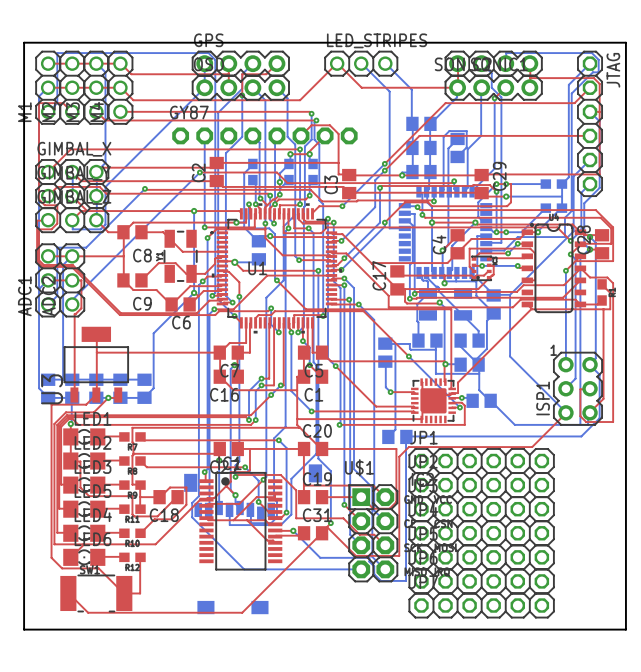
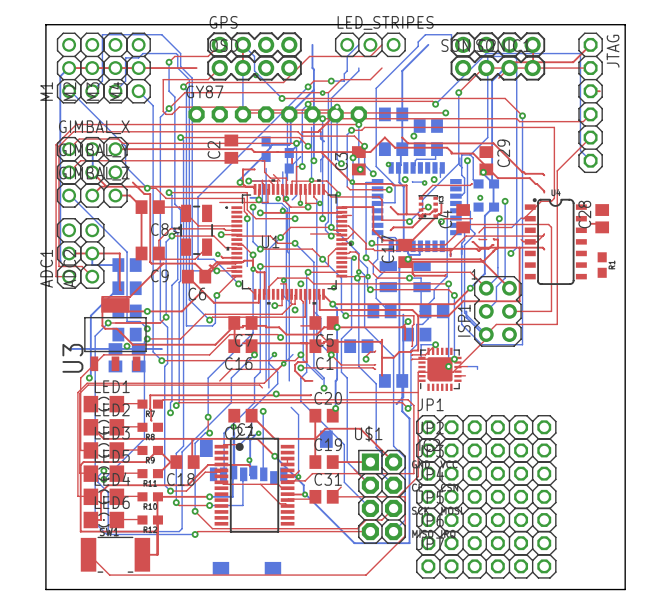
top track: (48, 63) (120, 63) (131, 74) (228, 74) -> none
bottom track: (96, 63) (105, 72) (105, 162) (96, 172) (96, 220) -> none
top track: none -> (219, 44) (208, 56) (174, 56) (169, 62)
bottom track: (204, 63) (204, 87) (105, 186) (105, 224) (100, 229) (72, 229) (72, 220) -> none
bottom track: none -> (242, 44) (254, 56) (254, 70) (282, 98)
bottom track: (252, 63) (242, 74) (242, 88) (218, 112) (218, 299) (234, 316) -> none
top track: (276, 63) (266, 74) (242, 74) (242, 95) -> none
bottom track: none -> (312, 44) (313, 160)
bottom track: none -> (358, 44) (347, 56) (347, 70) (344, 73) (344, 81) (331, 81)
bottom track: (361, 63) (389, 91) (389, 228) (404, 228) -> none
top track: none -> (382, 44) (370, 56) (309, 56) (283, 82) (187, 82) (183, 86)
bottom track: (385, 63) (411, 89) (412, 171) (402, 172) (402, 175) -> none
bottom track: none -> (428, 44) (402, 70) (402, 149) (400, 165) (398, 167) (399, 182) (403, 186) (403, 244) (408, 249) (409, 254)
bottom track: none -> (451, 44) (451, 34) (425, 34) (418, 41) (418, 46) (376, 88) (376, 166) (395, 185) (395, 202) (377, 203)
top track: (457, 63) (458, 87) (361, 87) (336, 63) (300, 100) (133, 100) (120, 87) -> (196, 68) (139, 68)
bottom track: (481, 63) (491, 73) (491, 87) (501, 97) (501, 242) (486, 243) -> none
bottom track: (505, 63) (506, 53) (591, 53) (598, 59) (598, 72) (592, 72) (571, 93) (571, 211) (564, 217) (564, 237) (517, 237) (504, 250) (486, 251) -> none
top track: none -> (590, 44) (573, 62) (510, 62)
bottom track: (590, 63) (568, 84) (568, 177) (562, 184) (562, 208) (538, 232) -> none
top track: (530, 78) (593, 78) (599, 83) (599, 174) (338, 174) (338, 133) (329, 125) (311, 125) (301, 135) -> none
bottom track: none -> (169, 62) (169, 91) (174, 97) (174, 204) (180, 210) (179, 402) (176, 405)
via: none -> (169, 62)
bottom track: none -> (510, 62) (492, 81) (493, 183)
top track: none -> (219, 68) (208, 79) (163, 79) (163, 111) (166, 114) (171, 114) (179, 107) (245, 107) (248, 110) (334, 110) (337, 107)
bottom track: none -> (242, 68) (242, 112)
bottom track: (252, 87) (265, 100) (265, 223) -> none
bottom track: (276, 87) (287, 98) (287, 136) (295, 144) (295, 256) (299, 260) -> none
bottom track: none -> (358, 68) (358, 70) (331, 98) (331, 227)
top track: none -> (382, 68) (370, 79) (341, 79) (328, 92) (184, 92) (169, 108)
bottom track: (457, 87) (457, 97) (430, 124) (430, 172) (429, 188) (426, 191) (427, 202) (432, 207) (432, 270) (434, 272) -> none
bottom track: (481, 87) (481, 135) (467, 149) (467, 187) (464, 191) -> none
top track: (590, 87) (574, 103) (445, 103) (384, 163) -> (590, 68) (483, 68) (458, 92)
bottom track: (242, 95) (242, 136) (225, 153) (225, 295) (232, 302) -> none
bottom track: (494, 98) (494, 168) (472, 191) -> none
via: (494, 98) -> none
top track: none -> (331, 81) (313, 81) (308, 86)
via: none -> (331, 81)
bottom track: none -> (183, 86) (186, 89) (186, 325) (212, 325) (215, 322) (216, 295)
via: none -> (183, 86)
bottom track: none -> (308, 86) (198, 196) (198, 259) (213, 259) (238, 283)
via: none -> (308, 86)
bottom track: none -> (313, 89) (290, 112) (290, 143) (271, 144) (266, 153) (240, 179) (240, 182)
bottom track: (48, 111) (57, 103) (57, 53) (208, 53) (215, 59) (215, 292) (212, 295) -> none
bottom track: none -> (69, 91) (125, 146) (125, 166) (147, 188)
top track: (72, 111) (63, 103) (39, 103) (39, 199) (44, 205) (57, 205) (57, 223) (51, 229) (39, 229) (39, 260) (43, 264) (72, 264) (120, 313) (196, 313) (209, 300) (222, 299) -> (216, 270) (236, 271)
bottom track: none -> (92, 91) (102, 81) (102, 34) (161, 34) (180, 53) (180, 66) (192, 78) (192, 270) (216, 270)
top track: (96, 111) (105, 120) (316, 120) -> none
bottom track: none -> (115, 91) (125, 81) (125, 57) (138, 57) (142, 53) (176, 53) (177, 68) (189, 79) (189, 299) (209, 320)
top track: (120, 111) (309, 111) (311, 113) -> none
bottom track: none -> (138, 91) (153, 105) (153, 351) (161, 360)
bottom track: (590, 111) (599, 121) (599, 187) (584, 203) (584, 243) (590, 249) (580, 258) (580, 424) -> none
bottom track: (311, 113) (311, 139) (304, 146) (303, 326) (298, 332) -> none
bottom track: none -> (328, 92) (328, 221) (325, 224) (325, 230) (331, 236)
bottom track: none -> (458, 92) (458, 163) (422, 199) (422, 208) (409, 221)
via: none -> (458, 92)
top track: none -> (282, 98) (505, 98) (522, 115)
via: none -> (282, 98)
bottom track: (316, 120) (314, 122) (314, 139) (319, 144) (319, 200) (323, 204) (323, 316) -> none
via: (316, 120) -> none
part: (421, 123) -> none
top track: none -> (308, 104) (311, 101) (432, 101) (435, 104)
bottom track: none -> (308, 104) (302, 110) (302, 166)
via: none -> (308, 104)
via: none -> (435, 104)
bottom track: none -> (337, 107) (337, 159) (341, 163)
via: none -> (337, 107)
bottom track: none -> (169, 108) (160, 117) (160, 320) (167, 327) (167, 363) (164, 366) (164, 485) (170, 491)
via: none -> (169, 108)
top track: none -> (242, 112) (445, 112)
via: none -> (445, 112)
bottom track: (204, 135) (204, 227) -> none
bottom track: (252, 135) (259, 142) (260, 198) -> none
part: none -> (393, 114)
top track: (590, 135) (419, 135) (384, 170) -> (590, 114) (583, 121) (519, 121) (516, 118) (322, 118)
bottom track: none -> (522, 115) (522, 344) (481, 344) (461, 324) (461, 243) (464, 240) (464, 225) (455, 225)
via: none -> (522, 115)
bottom track: (457, 138) (448, 148) (448, 244) (442, 250) (441, 272) (445, 281) (476, 281) (476, 295) (493, 313) (486, 320) (486, 348) (475, 360) (479, 365) (479, 390) (514, 424) (588, 424) (588, 415) (590, 412) -> none
bottom track: none -> (322, 118) (322, 218)
via: none -> (322, 118)
top track: none -> (358, 124) (76, 124) (56, 144) (56, 276) (69, 276)
bottom track: none -> (358, 124) (360, 169)
via: none -> (358, 124)
part: (457, 147) -> none
top track: (300, 149) (70, 149) (58, 161) -> (296, 143) (122, 143) (118, 139) (79, 139)
via: (300, 149) -> none
top track: none -> (351, 130) (361, 130) (364, 127) (554, 127) (554, 198) (551, 201) (541, 201) (523, 218)
bottom track: none -> (351, 130) (347, 134) (347, 186)
via: none -> (351, 130)
via: (290, 154) -> none
via: (309, 154) -> none
bottom track: (457, 156) (466, 147) (466, 131) (449, 131) (443, 136) (443, 189) (441, 191) -> none
via: none -> (413, 136)
top track: none -> (180, 137) (299, 137) (308, 146)
bottom track: none -> (180, 137) (183, 140) (183, 446) (176, 453) (176, 502)
via: none -> (180, 137)
top track: none -> (402, 137) (408, 143) (493, 143) (522, 172) (544, 175)
top track: none -> (590, 137) (557, 170) (557, 324) (496, 324) (486, 334) (486, 338) (452, 372) (418, 372) (418, 476) (397, 496)
bottom track: (590, 159) (573, 176) (573, 231) (510, 294) -> none
top track: (338, 162) (217, 162) (212, 167) (100, 167) (96, 172) -> (544, 192) (529, 178) (497, 178) (473, 153) (451, 153) (447, 147) (395, 147) (384, 137) (370, 152) (254, 152) (251, 149) (115, 149)
bottom track: (252, 163) (244, 173) (244, 227) (258, 241) (259, 236) (270, 236) -> none
bottom track: (384, 163) (342, 206) -> none
via: (384, 163) -> none
bottom track: none -> (296, 143) (296, 195) (292, 199)
via: none -> (296, 143)
via: none -> (308, 146)
top track: none -> (364, 146) (354, 136) (302, 136) (297, 131) (73, 131) (58, 146) (58, 266) (82, 266) (92, 276)
bottom track: none -> (364, 146) (364, 165) (373, 173)
via: none -> (364, 146)
bottom track: (384, 170) (375, 180) (375, 207) (341, 240) -> none
via: (384, 170) -> none
top track: (72, 172) (81, 181) (216, 181) (223, 186) (343, 186) (349, 192) (481, 192) (485, 196) (506, 196) -> none
top track: (199, 172) (276, 172) (287, 183) (452, 183) (454, 181) -> none
bottom track: (199, 172) (72, 299) (72, 304) -> none
via: (199, 172) -> none
part position: (288, 172) -> (289, 160)
part: (313, 172) -> none
part: none -> (393, 149)
bottom track: none -> (437, 149) (435, 159) (416, 159) (413, 167)
top track: none -> (321, 152) (353, 183) (406, 185) (406, 214)
via: (402, 175) -> none
bottom track: none -> (470, 154) (473, 157) (473, 179) (478, 183)
bottom track: none -> (470, 154) (461, 154) (461, 175) (464, 178) (464, 192) (461, 195) (455, 196)
bottom track: none -> (470, 154) (487, 137) (487, 56) (513, 56) (516, 59) (516, 247) (510, 253)
bottom track: (252, 180) (255, 183) (255, 204) -> none
bottom track: none -> (353, 157) (353, 238)
via: none -> (353, 157)
via: (454, 181) -> none
via: (279, 182) -> none
via: none -> (313, 160)
bottom track: none -> (467, 160) (467, 207)
via: none -> (467, 160)
top track: (496, 184) (511, 184) (511, 202) (507, 206) (432, 206) (428, 202) (405, 202) (384, 222) -> none
bottom track: (496, 184) (478, 202) (478, 216) (482, 220) (486, 220) -> none
via: (496, 184) -> none
bottom track: (506, 184) (545, 184) -> none
via: (506, 184) -> none
part: (553, 184) -> none
bottom track: (590, 184) (581, 192) (581, 230) (570, 240) -> (590, 160) (580, 150) (580, 53) (486, 53) (435, 104)
top track: (57, 186) (99, 186) (106, 193) (268, 193) (270, 195) -> (77, 163) (80, 160) (264, 160) (264, 172) (270, 178) (286, 178) (287, 189)
via: none -> (341, 163)
top track: (380, 187) (381, 186) (489, 185) (496, 191) -> none
bottom track: (380, 187) (380, 222) (344, 258) -> none
top track: (144, 188) (310, 189) (322, 201) (433, 201) -> none
bottom track: (144, 188) (86, 247) (57, 247) (57, 295) (48, 304) -> none
via: (144, 188) -> none
via: none -> (302, 166)
bottom track: (418, 191) (422, 194) (422, 214) -> none
bottom track: (496, 191) (496, 232) (486, 228) -> none
via: (496, 191) -> none
bottom track: none -> (266, 168) (266, 380)
bottom track: none -> (289, 168) (286, 172) (286, 202) (289, 205) (289, 380)
top track: none -> (254, 169) (242, 169) (242, 183) (245, 186) (253, 186) (255, 189)
via: none -> (360, 169)
top track: (279, 194) (265, 207) (265, 213) -> (248, 181) (277, 181) (277, 189)
via: (279, 194) -> none
via: (270, 195) -> none
top track: (309, 195) (305, 199) (278, 199) (270, 208) (269, 213) -> (308, 207) (290, 207) (283, 201) (282, 189)
via: (309, 195) -> none
bottom track: none -> (483, 172) (493, 183)
via: none -> (483, 172)
bottom track: (506, 196) (562, 196) -> none
via: (506, 196) -> none
via: none -> (373, 173)
via: (260, 198) -> none
via: (433, 201) -> none
via: none -> (405, 179)
via: none -> (434, 179)
via: (249, 204) -> none
via: (255, 204) -> none
via: (275, 204) -> none
via: none -> (248, 181)
bottom track: none -> (377, 181) (366, 182) (366, 257)
via: none -> (240, 182)
top track: (342, 206) (319, 206) (312, 213) -> (409, 221) (382, 220) (382, 199) (379, 196) (331, 196) (323, 189)
top track: (417, 207) (420, 210) (595, 210) (613, 227) (613, 261) (575, 261) -> none
top track: none -> (472, 183) (432, 185) (421, 198)
part: none -> (486, 183)
bottom track: none -> (493, 183) (493, 207) (484, 215) (484, 273) (470, 288)
bottom track: (545, 208) (521, 232) (506, 232) -> none
part: (553, 208) -> none
bottom track: (194, 211) (194, 292) (153, 333) (153, 388) (144, 397) (96, 397) -> none
via: (194, 211) -> none
top track: none -> (347, 186) (350, 189) (389, 189)
top track: none -> (147, 188) (156, 188) (166, 198) (244, 198) (244, 211) (247, 214) (247, 218)
via: none -> (147, 188)
top track: (246, 213) (246, 222) (133, 222) (123, 232) -> (259, 189) (258, 199)
top track: (284, 213) (283, 233) (321, 233) (327, 227) (557, 227) (570, 240) -> (296, 189) (296, 166) (302, 166)
top track: (298, 213) (299, 219) (302, 223) (333, 222) -> (309, 189) (309, 183) (312, 181) (326, 181) (337, 191)
top track: (303, 213) (305, 221) (325, 221) (328, 218) -> (314, 189) (313, 196) (316, 199)
bottom track: (404, 213) (414, 213) (414, 293) -> none
bottom track: (295, 214) (283, 226) (283, 280) (266, 297) (266, 476) (263, 479) -> none
via: none -> (389, 189)
top track: (422, 214) (425, 217) (600, 217) (611, 228) (611, 243) (581, 243) (570, 254) -> none
via: (422, 214) -> none
bottom track: none -> (337, 191) (337, 231) (358, 253) (358, 259) (367, 267) (367, 286) (370, 289)
top track: none -> (169, 192) (247, 192) (247, 210) (255, 218) (295, 218)
bottom track: none -> (169, 192) (171, 195) (171, 227) (177, 233) (177, 279) (171, 285) (170, 412)
via: none -> (169, 192)
bottom track: (328, 218) (328, 358) (335, 366) -> none
top track: (48, 220) (37, 220) (37, 261) (42, 266) (71, 266) (119, 315) (215, 315) (219, 311) (268, 311) (271, 308) -> none
bottom track: none -> (69, 195) (127, 252) (127, 321) (140, 321) (147, 328)
top track: (96, 220) (108, 232) (123, 232) -> (115, 195) (129, 195) (141, 207) (141, 253)
bottom track: (404, 220) (412, 225) (409, 298) -> none
via: (236, 222) -> none
bottom track: (333, 222) (333, 281) (340, 288) (339, 424) -> none
via: (333, 222) -> none
bottom track: (384, 222) (384, 226) (341, 269) -> none
via: (384, 222) -> none
top track: (432, 222) (572, 224) (584, 235) (602, 235) -> none
via: (432, 222) -> none
bottom track: (475, 222) (452, 245) (452, 269) (449, 272) -> none
top track: (265, 223) (265, 238) (282, 255) (331, 256) -> (280, 237) (290, 227) (331, 227) (334, 230) (341, 230)
via: none -> (258, 199)
bottom track: none -> (316, 199) (316, 340) (331, 354)
bottom track: none -> (505, 201) (505, 278) (496, 286) (496, 301) (486, 311)
via: none -> (505, 201)
via: (204, 227) -> none
bottom track: (288, 228) (285, 231) (285, 426) (274, 438) (274, 499) (276, 501) (276, 517) (271, 523) (250, 523) (250, 509) -> none
bottom track: (308, 228) (313, 233) (313, 362) (316, 365) (316, 453) (291, 478) (291, 514) (280, 525) (229, 525) (229, 509) -> none
top track: (265, 229) (216, 229) (207, 238) -> none
top track: (123, 232) (123, 280) (133, 290) (156, 290) (171, 304) (190, 286) (222, 284) -> (221, 256) (236, 257)
bottom track: none -> (253, 207) (253, 241) (260, 249)
via: none -> (253, 207)
bottom track: none -> (282, 207) (286, 211) (286, 360) (280, 366)
via: none -> (308, 207)
top track: (331, 232) (342, 234) (397, 289) -> (341, 207) (373, 207) (373, 230) (383, 240) (412, 240) (435, 216) (441, 212) (441, 204)
top track: none -> (390, 207) (397, 214) (421, 216) (429, 214) (435, 210)
top track: none -> (428, 207) (421, 210)
via: none -> (428, 207)
part position: (445, 232) -> (416, 207)
part: none -> (486, 207)
top track: (496, 232) (506, 232) -> none
via: (496, 232) -> none
via: (506, 232) -> none
top track: (538, 232) (526, 232) (519, 238) (471, 238) (447, 263) (371, 263) -> none
via: (538, 232) -> none
top track: (457, 235) (442, 250) -> none
top track: (270, 236) (331, 237) -> (260, 212) (341, 212)
bottom track: none -> (455, 210) (470, 211) (470, 228) (474, 233) (464, 244) (464, 312) (486, 334)
bottom track: (486, 236) (477, 236) (477, 278) (493, 294) (510, 294) -> none
bottom track: (590, 237) (595, 242) (595, 358) (590, 365) (599, 374) (599, 418) (581, 436) (406, 436) (406, 580) (380, 580) (374, 574) (374, 566) (369, 561) (369, 557) (320, 557) (293, 530) -> none
via: (590, 237) -> none
bottom track: (207, 238) (207, 469) (204, 472) -> none
via: (207, 238) -> none
via: none -> (260, 212)
top track: none -> (425, 214) (412, 227) (393, 227) (390, 230)
via: (341, 240) -> none
via: (570, 240) -> none
bottom track: none -> (455, 218) (447, 218) (447, 276) (434, 289) (434, 298) (428, 304) (428, 318) (422, 324) (416, 324) (416, 344) (410, 350) (410, 405) (408, 408)
via: (517, 243) -> none
bottom track: none -> (247, 218) (247, 266)
via: none -> (247, 218)
via: none -> (295, 218)
via: none -> (322, 218)
top track: none -> (472, 218) (444, 218) (441, 221)
bottom track: none -> (499, 218) (497, 267)
via: none -> (499, 218)
via: none -> (409, 221)
via: none -> (441, 221)
via: (590, 249) -> none
part: (258, 250) -> none
via: (442, 250) -> none
top track: (331, 251) (332, 253) (346, 253) (362, 269) -> (341, 225) (348, 225) (366, 243) (366, 249) (374, 250) (451, 250) (466, 236) (542, 236) (544, 234) (544, 234) (537, 241) (523, 241)
via: none -> (331, 227)
via: (508, 253) -> none
bottom track: (570, 254) (575, 259) (575, 378) (565, 388) -> none
via: (570, 254) -> none
top track: (48, 256) (123, 256) -> none
bottom track: (72, 256) (63, 264) (63, 379) -> none
top track: (222, 256) (216, 258) (215, 263) (205, 273) (186, 273) (175, 263) (158, 263) (141, 280) -> (236, 230) (170, 228) (158, 240) (158, 253) (164, 259) (195, 259) (207, 247)
top track: (527, 256) (524, 258) (489, 259) -> none
top track: (580, 256) (565, 270) -> none
via: (344, 258) -> none
bottom track: (258, 259) (255, 262) (234, 262) -> none
top track: none -> (221, 234) (270, 236) (277, 243) (295, 243)
via: none -> (221, 234)
via: (299, 260) -> none
top track: (222, 261) (233, 261) (243, 270) (318, 270) -> none
bottom track: none -> (171, 236) (166, 241) (166, 317)
via: none -> (171, 236)
via: (234, 262) -> none
via: none -> (331, 236)
bottom track: none -> (280, 237) (269, 249) (269, 363) (277, 372) (277, 383) (251, 409) (251, 433) (240, 444)
via: none -> (280, 237)
bottom track: (482, 265) (517, 265) -> none
via: (482, 265) -> none
via: (517, 265) -> none
top track: none -> (472, 241) (479, 247) (542, 247) (544, 249)
part position: (481, 268) -> (428, 207)
bottom track: none -> (295, 243) (313, 262) (313, 367) (324, 378) (324, 388)
via: none -> (295, 243)
via: none -> (371, 243)
bottom track: (318, 270) (318, 458) (330, 471) (330, 523) -> none
via: (318, 270) -> none
bottom track: (565, 270) (565, 364) -> none
via: (565, 270) -> none
top track: (364, 271) (388, 295) (388, 307) (512, 307) (520, 299) (575, 299) (580, 304) (597, 304) (602, 300) -> (373, 244) (445, 244) (466, 224) (548, 224) (551, 227) (551, 311) (509, 311)
top track: (474, 271) (469, 266) (469, 248) (530, 248) (535, 253) (535, 280) (527, 280) -> none
bottom track: none -> (391, 246) (389, 249) (389, 265) (376, 279) (376, 298) (390, 311)
bottom track: none -> (398, 246) (395, 237) (377, 237) (377, 259) (373, 263) (373, 273)
bottom track: none -> (420, 246) (419, 254) (409, 254)
bottom track: (418, 272) (423, 280) (427, 281) (427, 293) (417, 304) (418, 340) -> none
bottom track: (426, 272) (426, 277) (438, 287) (438, 291) (478, 330) (478, 340) -> none
top track: none -> (519, 247) (519, 301) (463, 301) (448, 315) (418, 315)
top track: (222, 275) (207, 276) (202, 281) -> (236, 248) (225, 247) (213, 236) (171, 236)
top track: none -> (260, 249) (312, 249) (322, 259)
via: none -> (260, 249)
top track: (331, 275) (267, 275) (233, 309) (214, 309) -> (341, 248) (335, 249) (328, 256) (328, 266) (260, 266)
top track: (344, 278) (332, 278) (331, 280) -> (358, 269) (358, 254) (355, 252) (341, 253)
bottom track: (344, 278) (354, 288) (354, 469) (372, 487) (372, 556) (385, 569) -> (358, 269) (364, 275) (364, 327) (393, 356) (393, 446) (405, 457) (405, 520) (393, 531)
via: (344, 278) -> none
bottom track: (48, 280) (39, 289) (39, 388) (48, 397) (72, 397) (70, 423) -> none
bottom track: none -> (92, 253) (92, 265) (118, 265) (118, 288) (90, 315) (89, 378)
top track: (81, 280) (81, 308) (74, 314) (74, 395) -> (101, 253) (119, 253) (121, 290)
top track: (276, 280) (305, 309) (451, 309) (452, 388) -> none
via: (276, 280) -> none
via: none -> (510, 253)
top track: (580, 280) (563, 297) (409, 298) -> none
bottom track: (202, 281) (198, 285) (198, 496) (192, 502) (192, 517) (244, 569) (361, 569) -> none
bottom track: none -> (253, 254) (253, 333) (208, 378) (208, 417)
via: none -> (253, 254)
bottom track: none -> (409, 254) (409, 257) (399, 267) (399, 379) (402, 380) (402, 411) (409, 418) (409, 543) (354, 543) (303, 492) (303, 485) (274, 456)
via: (444, 283) -> none
bottom track: none -> (353, 257) (351, 328) (341, 338) (341, 372) (347, 378) (347, 462) (370, 485)
top track: none -> (366, 257) (380, 272) (470, 272) (486, 288)
via: none -> (366, 257)
top track: (602, 284) (610, 292) (610, 309) (532, 309) (527, 304) -> none
bottom track: (344, 285) (344, 504) -> none
bottom track: none -> (322, 259) (341, 278) (341, 311) (345, 315)
via: none -> (322, 259)
top track: none -> (408, 259) (480, 259) (509, 288)
via: none -> (408, 259)
top track: none -> (163, 263) (129, 296) (102, 296) (102, 325) (105, 328) (116, 328) (132, 344) (215, 344) (232, 327) (242, 325) (279, 327) (286, 334) (316, 334) (324, 327) (405, 327) (404, 339)
part: none -> (127, 265)
via: (194, 292) -> none
bottom track: none -> (260, 266) (260, 372) (254, 378) (254, 402) (224, 433) (223, 480)
via: none -> (260, 266)
top track: (414, 293) (416, 291) (516, 291) (523, 285) (564, 285) (580, 268) (590, 277) (607, 277) (613, 283) (613, 422) (586, 422) (580, 416) (580, 389) (590, 388) -> none
via: (414, 293) -> none
bottom track: (510, 294) (510, 356) (565, 412) -> none
via: (212, 295) -> none
bottom track: none -> (497, 267) (497, 276) (486, 288)
bottom track: (239, 296) (239, 461) (235, 465) (235, 476) -> none
via: none -> (216, 270)
via: (409, 298) -> none
via: none -> (308, 272)
top track: (331, 299) (349, 299) -> (341, 271) (308, 272)
bottom track: (349, 299) (350, 534) (361, 545) -> (308, 272) (306, 372) (300, 378) (300, 401) (344, 444) (344, 482) (370, 508)
top track: none -> (373, 273) (377, 278) (409, 278)
top track: (232, 302) (222, 303) -> (216, 295) (236, 276)
via: (232, 302) -> none
bottom track: (439, 302) (444, 307) (444, 363) (460, 364) -> none
via: (439, 302) -> none
bottom track: (358, 304) (374, 319) (374, 510) (385, 521) -> (357, 278) (358, 366) (376, 383) (376, 447) (382, 453) (382, 473) (393, 485)
part position: (445, 304) -> (405, 276)
part: (493, 304) -> none
via: none -> (357, 278)
bottom track: none -> (409, 278) (421, 278) (419, 311)
via: none -> (409, 278)
top track: (531, 308) (458, 382) (458, 393) (439, 395) (433, 400) (422, 400) -> none
bottom track: (214, 309) (209, 314) (208, 509) -> none
via: (214, 309) -> none
top track: (603, 309) (603, 398) (590, 412) -> none
via: none -> (238, 283)
via: none -> (300, 283)
bottom track: none -> (448, 283) (448, 366)
via: none -> (448, 283)
part: none -> (127, 288)
via: (234, 316) -> none
top track: (323, 316) (294, 315) (293, 322) -> (209, 320) (212, 317) (305, 317) (305, 294)
via: none -> (470, 288)
top track: none -> (370, 289) (448, 289) (454, 295)
via: none -> (370, 289)
top track: none -> (202, 291) (182, 311) (121, 311)
top track: (246, 322) (246, 343) (229, 343) (220, 352) (142, 352) -> (259, 294) (258, 302) (213, 302) (187, 276)
top track: (250, 322) (249, 352) (237, 352) (237, 376) -> (264, 294) (264, 272) (257, 272) (253, 267) (253, 260) (216, 262) (205, 273) (195, 263) (151, 263) (150, 194) (144, 194) (132, 182)
top track: (255, 322) (255, 317) (258, 315) (271, 315) (275, 311) (363, 311) (408, 356) -> (268, 294) (269, 286) (277, 278) (308, 278) (313, 283) (448, 283)
top track: (269, 322) (269, 378) (261, 378) -> (282, 294) (282, 305) (274, 305)
top track: (274, 322) (274, 385) (261, 385) -> (287, 294) (286, 283) (280, 283)
top track: (284, 322) (283, 385) (280, 385) -> (296, 294) (295, 304) (292, 304) (282, 314) (205, 314) (180, 338) (147, 338)
top track: (303, 322) (302, 341) -> (314, 294) (313, 325) (300, 325)
top track: (307, 322) (307, 352) (303, 352) (303, 376) -> (318, 294) (319, 309) (412, 309) (418, 315)
top track: (312, 322) (312, 352) (322, 352) (330, 361) (444, 361) (445, 382) -> (323, 294) (332, 304) (454, 304) (470, 288)
via: none -> (216, 295)
bottom track: none -> (454, 295) (454, 359)
via: none -> (454, 295)
via: (278, 332) -> none
via: (291, 332) -> none
via: (298, 332) -> none
bottom track: none -> (332, 304) (337, 308) (335, 408)
via: none -> (332, 304)
top track: (96, 334) (96, 395) (86, 404) (51, 404) (51, 557) (62, 568) (98, 568) (124, 593) -> none
via: none -> (274, 305)
via: none -> (295, 309)
part: none -> (127, 311)
via: none -> (147, 311)
part: none -> (382, 311)
bottom track: (436, 340) (435, 373) (479, 373) -> none
part: (469, 340) -> none
via: (302, 341) -> none
bottom track: (385, 343) (409, 343) (410, 349) (435, 349) -> none
top track: none -> (345, 315) (413, 315) (411, 346)
via: none -> (345, 315)
top track: none -> (418, 315) (418, 350) (399, 351) (393, 357) (382, 357)
top track: none -> (166, 317) (160, 322)
via: none -> (166, 317)
via: none -> (209, 320)
top track: none -> (408, 321) (402, 327)
via: none -> (408, 321)
top track: none -> (108, 322) (115, 322)
bottom track: none -> (108, 322) (95, 336) (95, 522) (106, 534) (195, 534)
via: none -> (108, 322)
part: (385, 352) -> none
bottom track: (408, 356) (459, 407) -> none
via: (408, 356) -> none
via: none -> (337, 327)
via: none -> (147, 328)
bottom track: (385, 361) (385, 387) (390, 392) -> none
part: none -> (127, 334)
part: none -> (416, 334)
via: (445, 364) -> none
part: (469, 364) -> none
bottom track: (234, 365) (230, 369) (230, 490) (235, 495) (235, 503) (239, 508) -> none
via: (234, 365) -> none
via: (309, 365) -> none
top track: (335, 366) (376, 406) (414, 407) -> none
via: (335, 366) -> none
via: none -> (280, 337)
bottom track: none -> (147, 338) (144, 341) (144, 438) (103, 479)
via: none -> (147, 338)
top track: none -> (242, 343) (324, 343) (324, 341) (382, 341) (382, 339) (382, 375)
top track: none -> (300, 343) (306, 343) (306, 362) (297, 362) (295, 365) (295, 370) (305, 380) (312, 380)
top track: none -> (435, 344) (425, 354) (411, 355)
bottom track: none -> (435, 344) (421, 344) (419, 357)
via: none -> (435, 344)
via: none -> (127, 346)
top track: (219, 376) (233, 390) (297, 390) -> none
top track: (304, 376) (297, 376) (297, 424) (321, 448) (396, 448) (396, 501) (389, 508) (373, 508) (361, 497) -> none
part: none -> (358, 346)
bottom track: (261, 378) (249, 391) (249, 420) -> none
via: (261, 378) -> none
top track: none -> (375, 350) (370, 351) (366, 359)
top track: (421, 382) (421, 419) (297, 419) -> none
bottom track: none -> (254, 354) (231, 378) (231, 402) (182, 451) (182, 528) (179, 531) (108, 531) (108, 492) (98, 482) (98, 476) (103, 470)
via: none -> (254, 354)
via: (280, 385) -> none
top track: none -> (300, 354) (295, 360) (161, 360)
via: none -> (300, 354)
top track: none -> (331, 354) (341, 365) (375, 364)
via: none -> (331, 354)
part: (48, 388) -> none
part: (72, 388) -> none
part: (144, 388) -> none
ISP1 position: (577, 388) -> (497, 311)
via: none -> (366, 359)
top track: none -> (454, 359) (411, 360)
via: none -> (454, 359)
via: none -> (161, 360)
top track: (390, 392) (414, 393) -> none
via: (390, 392) -> none
top track: (118, 395) (115, 397) (108, 397) (93, 412) (65, 412) (54, 423) (54, 544) (83, 544) -> none
via: (108, 397) -> none
top track: none -> (280, 366) (277, 369) (231, 369) (219, 380)
via: none -> (448, 366)
via: (461, 397) -> none
top track: none -> (300, 367) (375, 369)
via: none -> (300, 367)
part: (481, 400) -> none
top track: (452, 403) (461, 402) (464, 405) (464, 424) (410, 424) -> none
via: (459, 407) -> none
via: none -> (89, 378)
top track: (311, 411) (414, 412) -> none
via: (311, 411) -> none
top track: (565, 412) (532, 447) (408, 447) (399, 456) (399, 555) (355, 555) (327, 527) (242, 612) (88, 612) (68, 593) -> none
via: (249, 420) -> none
top track: (255, 420) (250, 424) (78, 424) (72, 419) (68, 419) (61, 426) (61, 484) (70, 485) -> (280, 337) (277, 334) (229, 334) (209, 354) (103, 354) (80, 378) (80, 450) (90, 450)
via: (255, 420) -> none
via: none -> (324, 388)
top track: (70, 423) (70, 461) (80, 461) (80, 487) (89, 496) (132, 496) (132, 514) (134, 516) (157, 516) (176, 497) -> (192, 438) (192, 462)
via: (70, 423) -> none
via: (339, 424) -> none
via: none -> (276, 393)
top track: (140, 436) (144, 440) (278, 440) -> (157, 404) (163, 399) (408, 399) (413, 405) (413, 473) (312, 473) (305, 480) (287, 482)
part position: (397, 436) -> (393, 380)
top track: none -> (176, 405) (179, 402) (402, 402) (408, 408)
via: none -> (176, 405)
via: (278, 440) -> none
via: none -> (335, 408)
via: none -> (408, 408)
bottom track: none -> (263, 411) (263, 480)
via: none -> (263, 411)
via: none -> (170, 412)
top track: (237, 448) (304, 448) -> none
top track: (249, 448) (249, 470) (248, 472) (230, 472) (230, 481) (214, 498) (199, 500) (155, 544) (84, 544) (70, 557) -> (250, 466) (208, 464) (187, 485) (108, 485) (100, 492) (100, 520) (90, 520)
top track: none -> (208, 417) (209, 433)
via: none -> (208, 417)
top track: (219, 460) (219, 448) (219, 453) (134, 453) (132, 455) (132, 484) (140, 485) (140, 509) -> (157, 531) (80, 531) (80, 464) (83, 462) (145, 462) (158, 450) (170, 462) (157, 473)
top track: none -> (92, 427) (103, 438) (257, 438) (274, 456)
top track: (140, 461) (146, 467) (245, 467) -> none
bottom track: none -> (209, 433) (205, 433) (195, 443) (195, 511)
via: none -> (209, 433)
bottom track: none -> (234, 433) (232, 496) (209, 496)
bottom track: none -> (257, 433) (250, 440) (250, 475) (253, 478)
bottom track: (245, 467) (258, 480) (258, 501) -> none
top track: (204, 472) (206, 481) -> (240, 444) (224, 444) (221, 446)
via: (204, 472) -> none
top track: (235, 476) (237, 474) (280, 474) (296, 490) (296, 518) (343, 518) (359, 534) (374, 534) (385, 545) -> (195, 511) (212, 528) (357, 528) (366, 520) (382, 520) (393, 508)
via: (235, 476) -> none
top track: (263, 479) (239, 503) (208, 503) (206, 505) -> (170, 491) (186, 491) (205, 472) (219, 472) (221, 470)
via: (263, 479) -> none
top track: (303, 485) (373, 485) (385, 497) -> (251, 415) (274, 438) (315, 438) (325, 428) (360, 428) (393, 462)
top track: (226, 486) (235, 495) -> none
via: none -> (274, 456)
top track: (140, 497) (153, 497) -> none
top track: (159, 497) (170, 487) (186, 487) (186, 504) (171, 519) (154, 519) (140, 533) -> none
top track: (275, 497) (256, 497) (233, 520) -> none
top track: (258, 501) (268, 511) (275, 511) -> (299, 470) (295, 475) (287, 476)
via: (258, 501) -> none
via: (344, 504) -> none
via: none -> (103, 470)
via: none -> (103, 479)
bottom track: none -> (243, 480) (242, 505) (209, 505)
via: (330, 523) -> none
via: none -> (170, 491)
top track: none -> (209, 496) (157, 496) (157, 554)
via: none -> (209, 496)
top track: none -> (332, 496) (405, 496) (405, 535) (366, 575) (109, 575) (88, 554)
top track: none -> (176, 502) (179, 505) (209, 505)
via: none -> (176, 502)
via: none -> (209, 505)
via: none -> (195, 511)
top track: none -> (370, 531) (198, 531) (195, 534)
via: none -> (195, 534)

